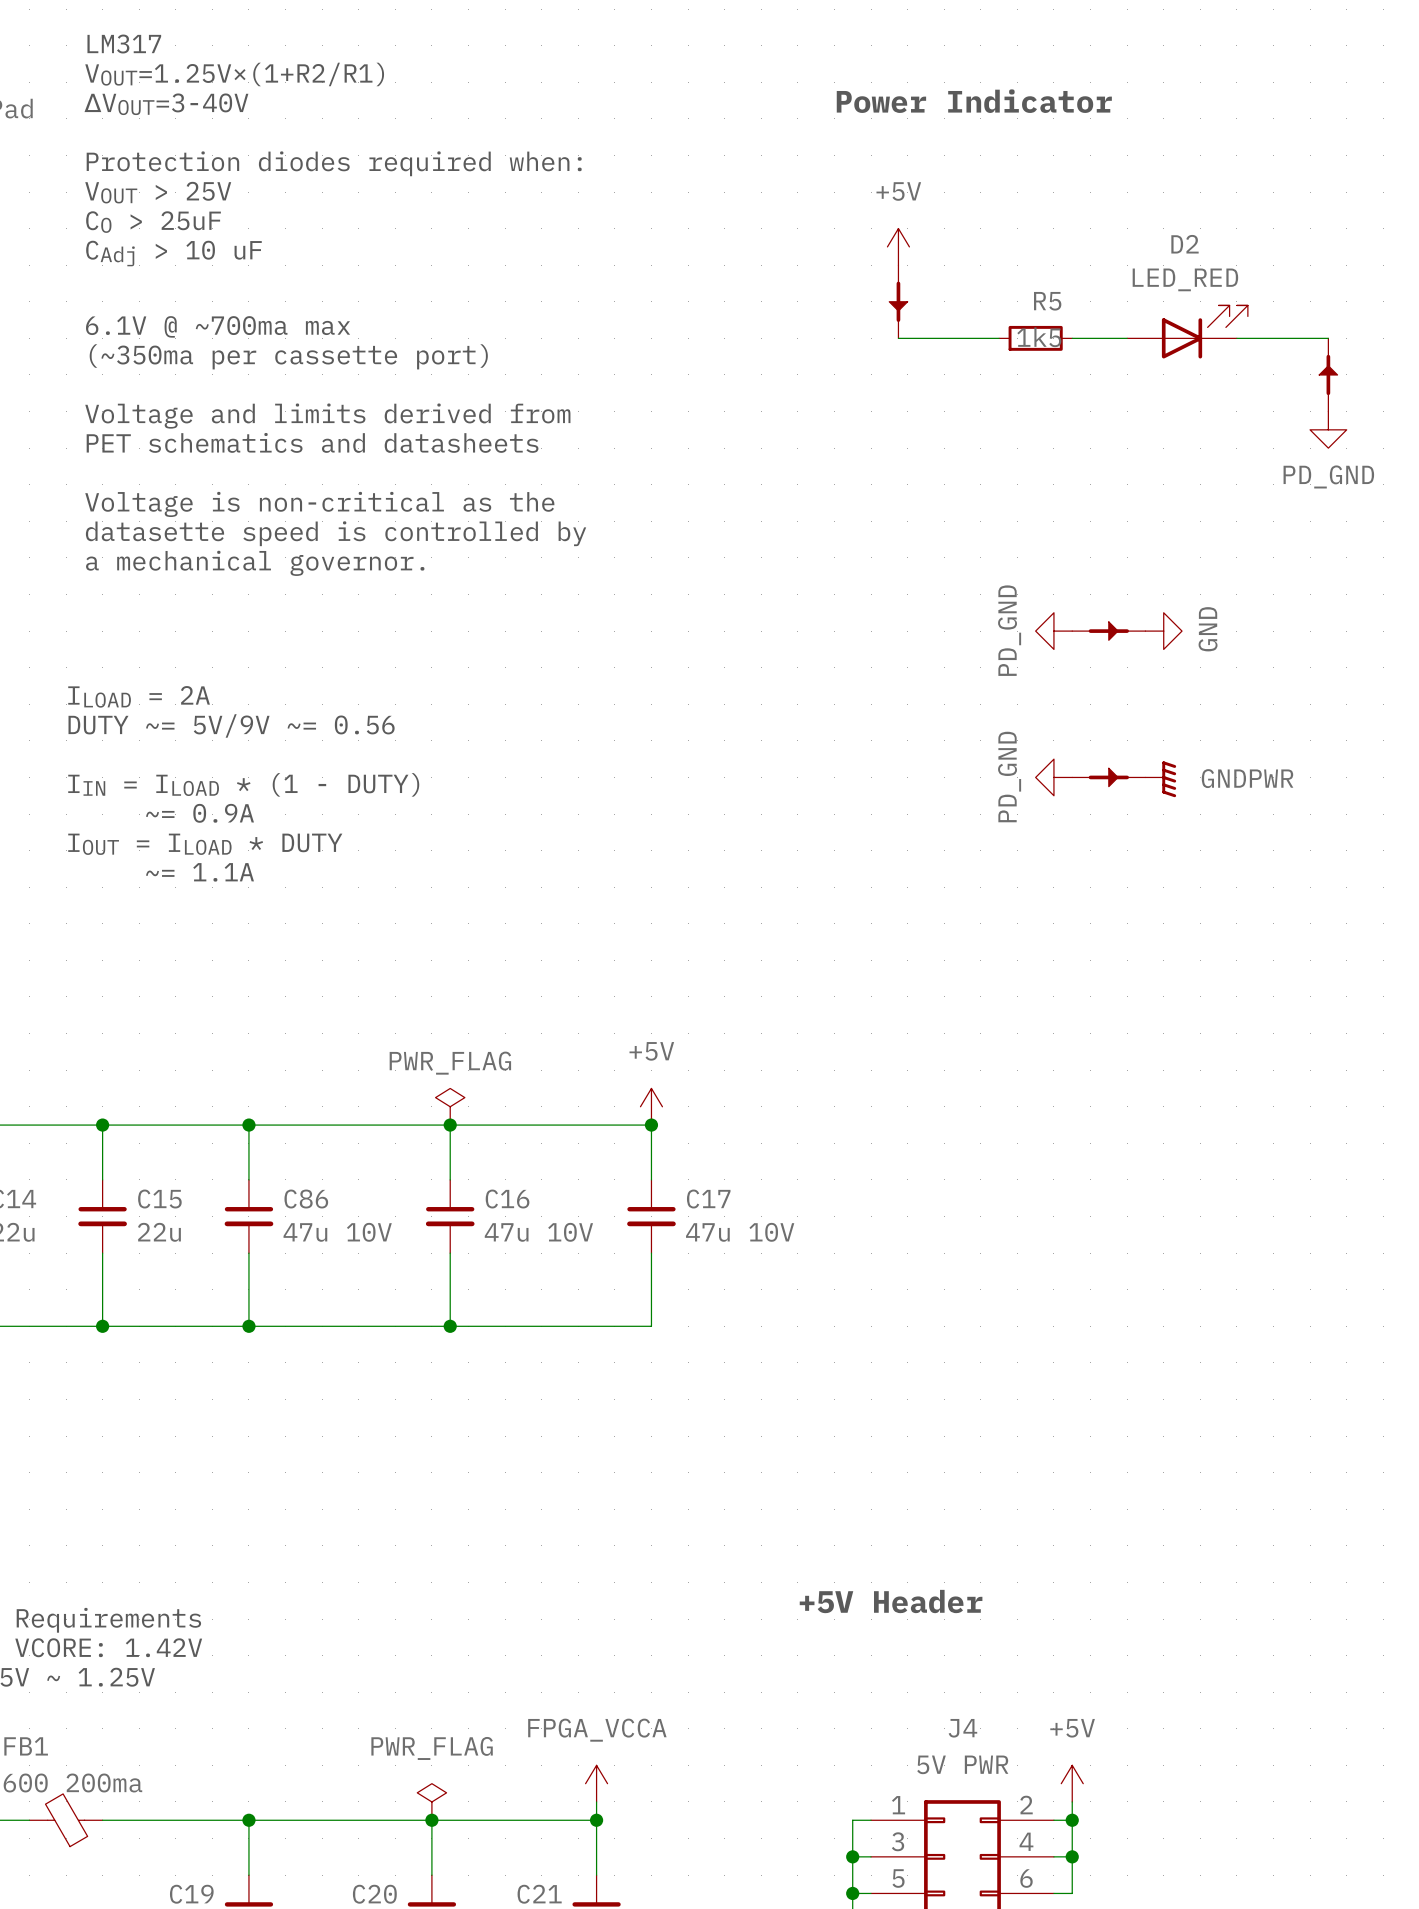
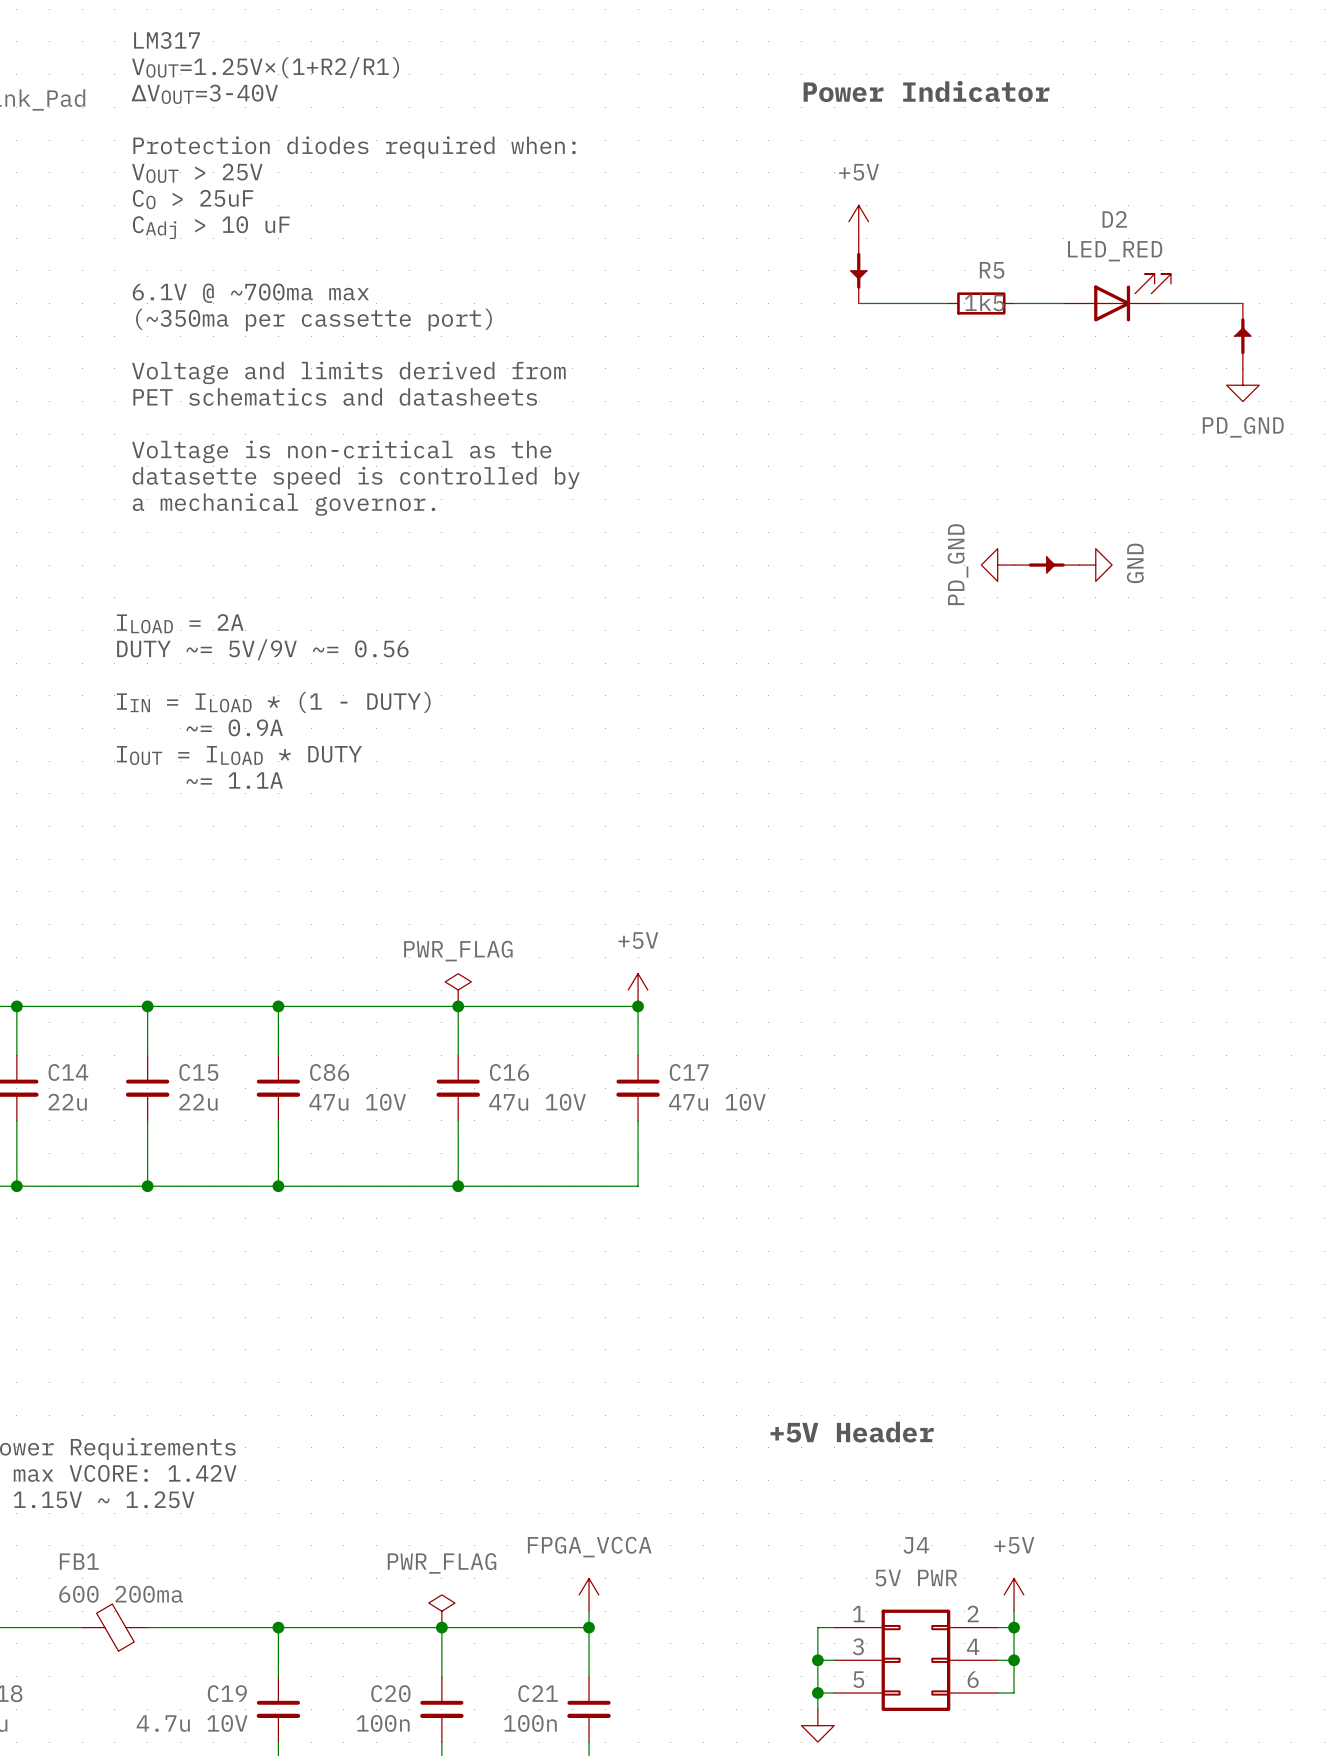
power symbol: PD_GND (1053, 777) -> none
part: (1108, 777) -> none
power symbol: GNDPWR (1160, 779) -> none

